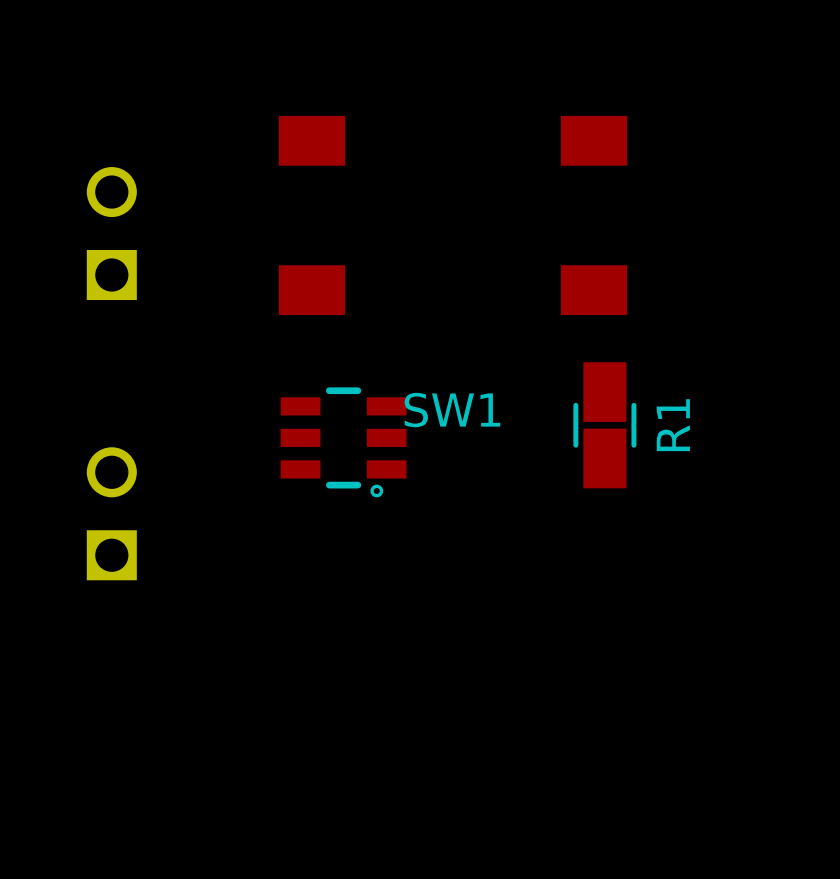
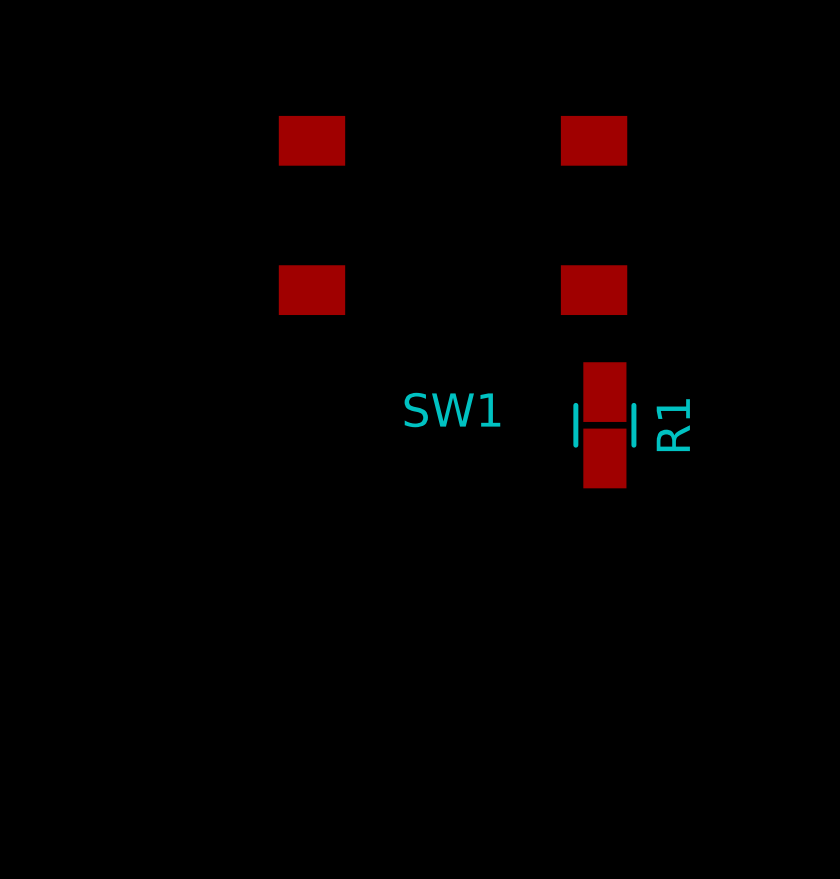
part: (111, 233) -> none
part: (343, 442) -> none
part: (111, 513) -> none

